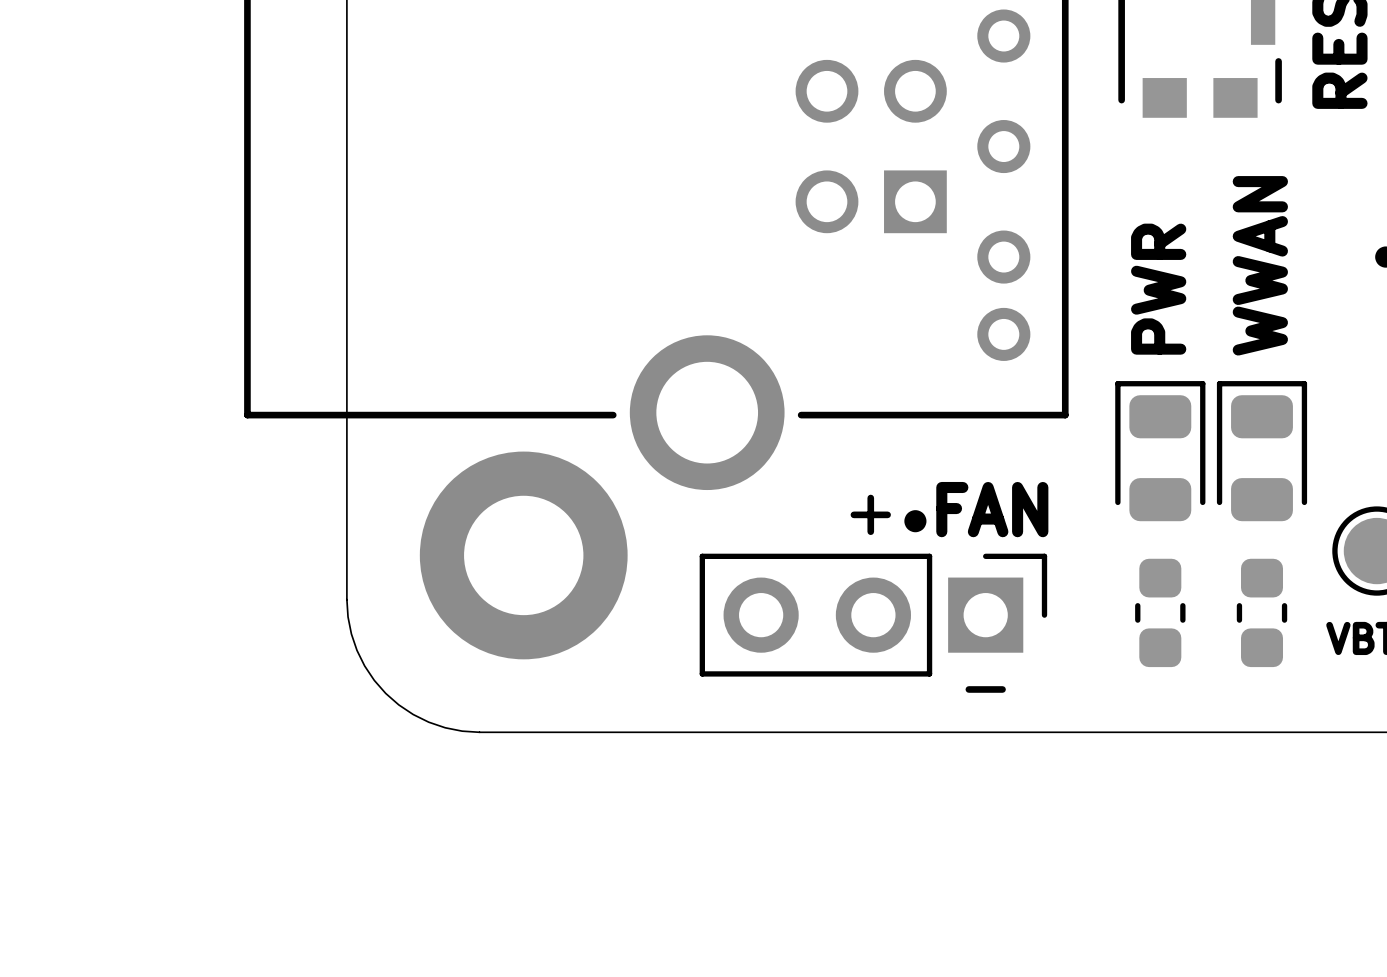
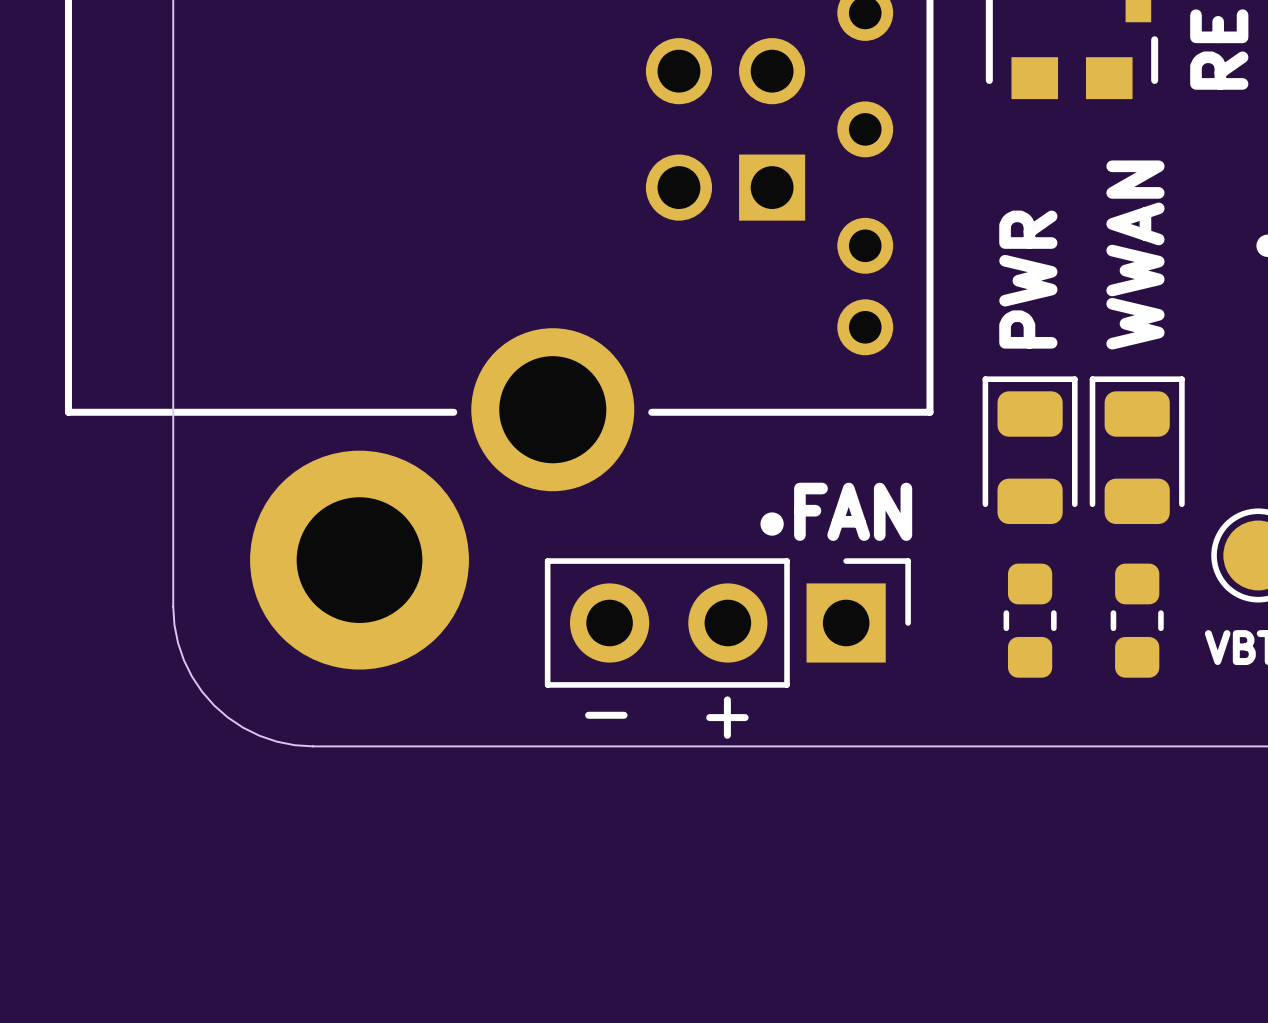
text position: + (870, 514) -> + (727, 717)
text position: - (985, 689) -> - (606, 715)

